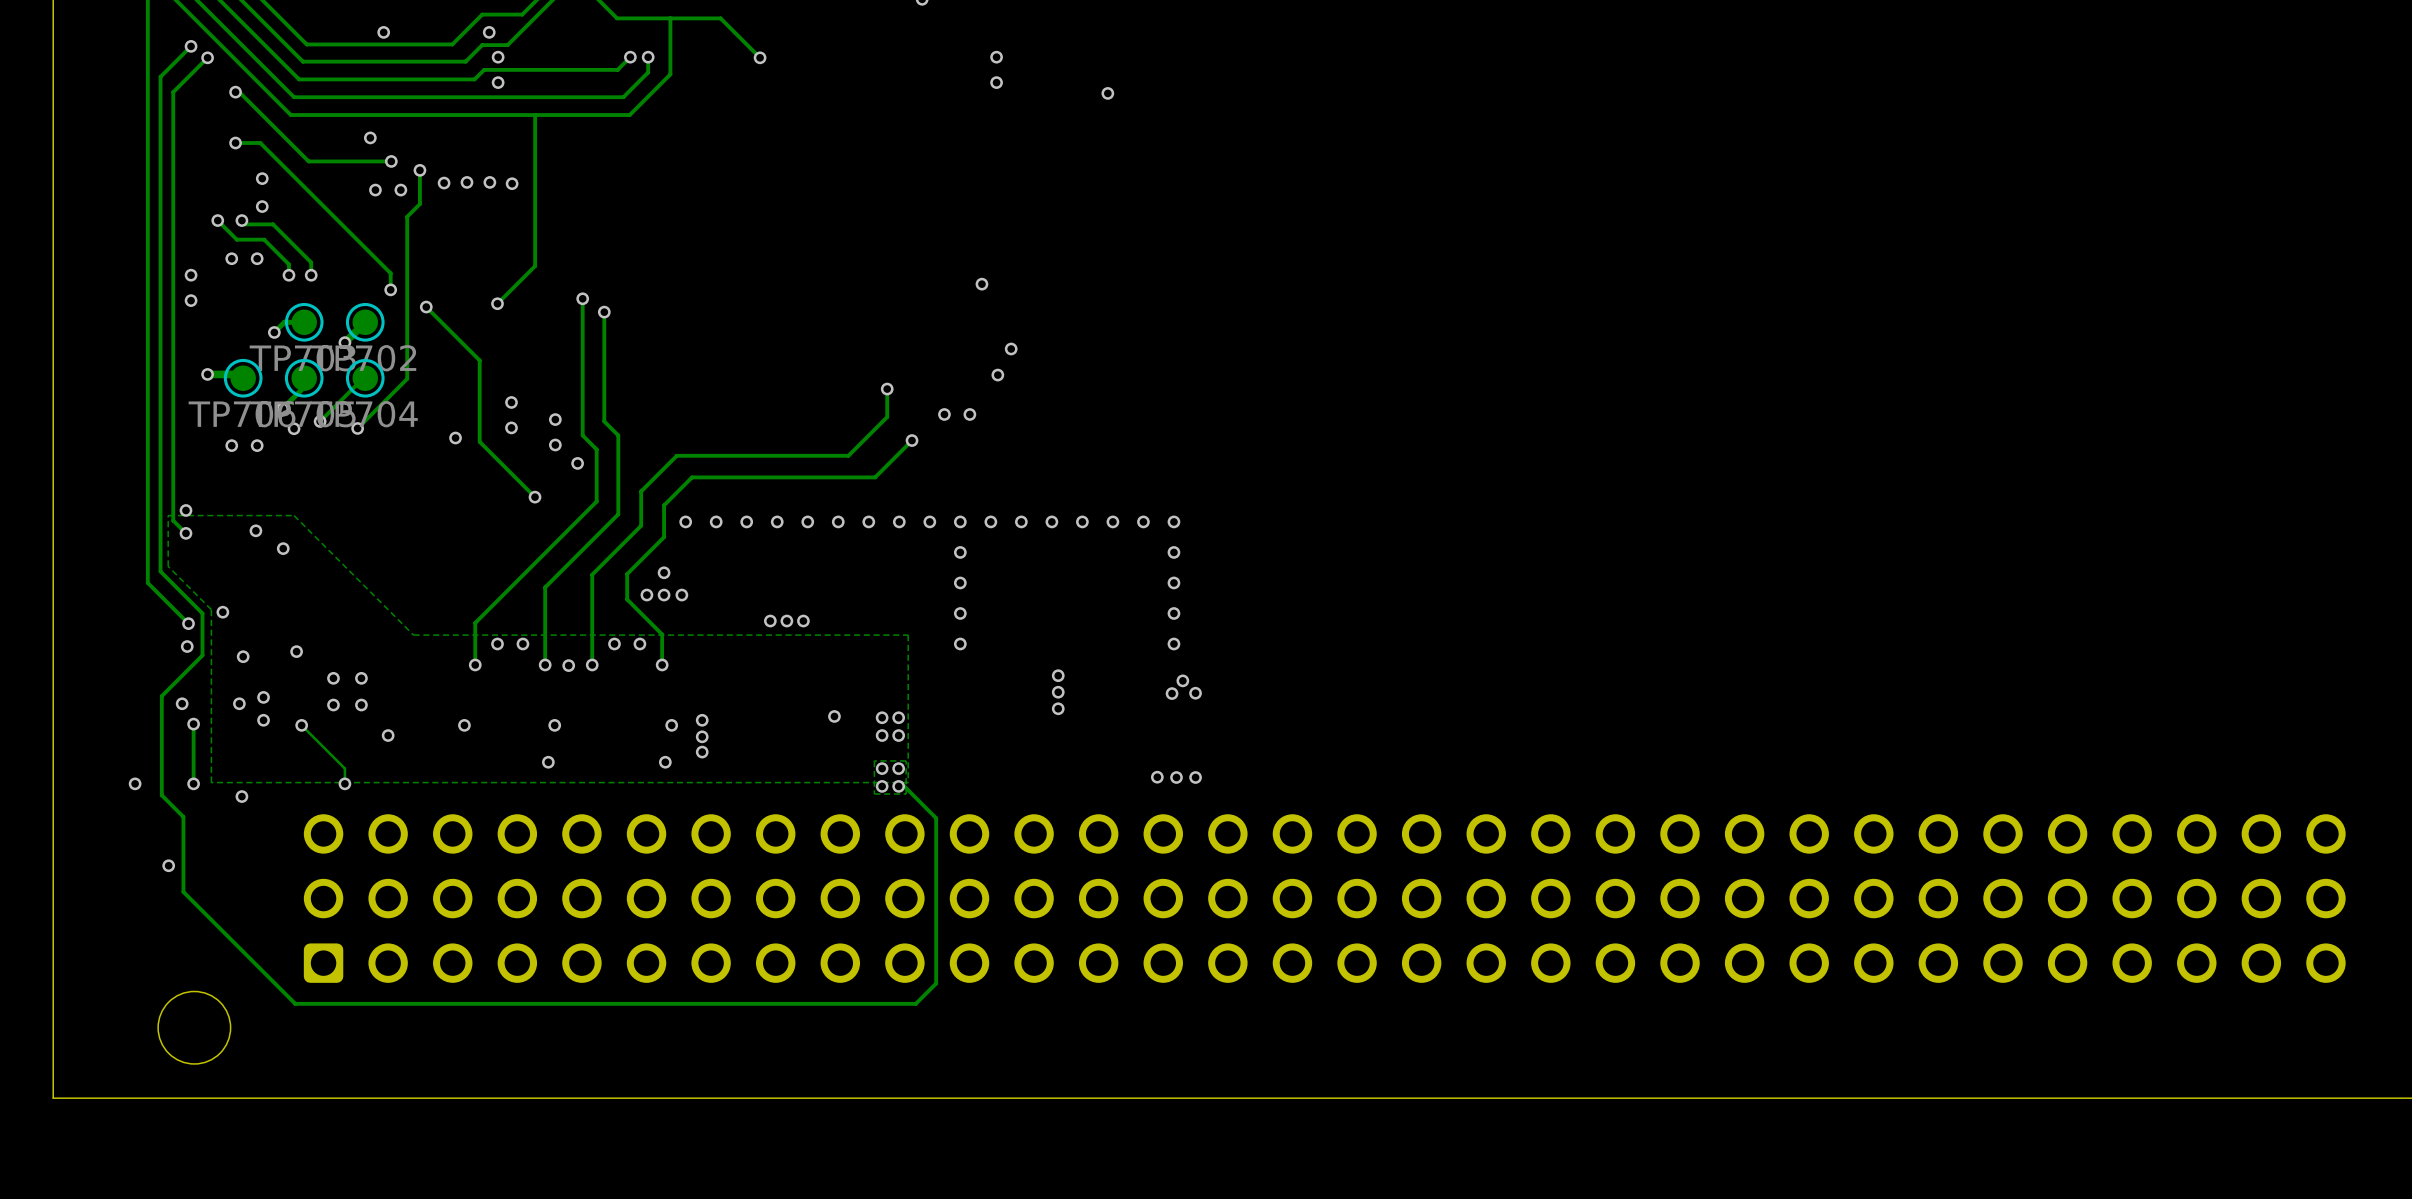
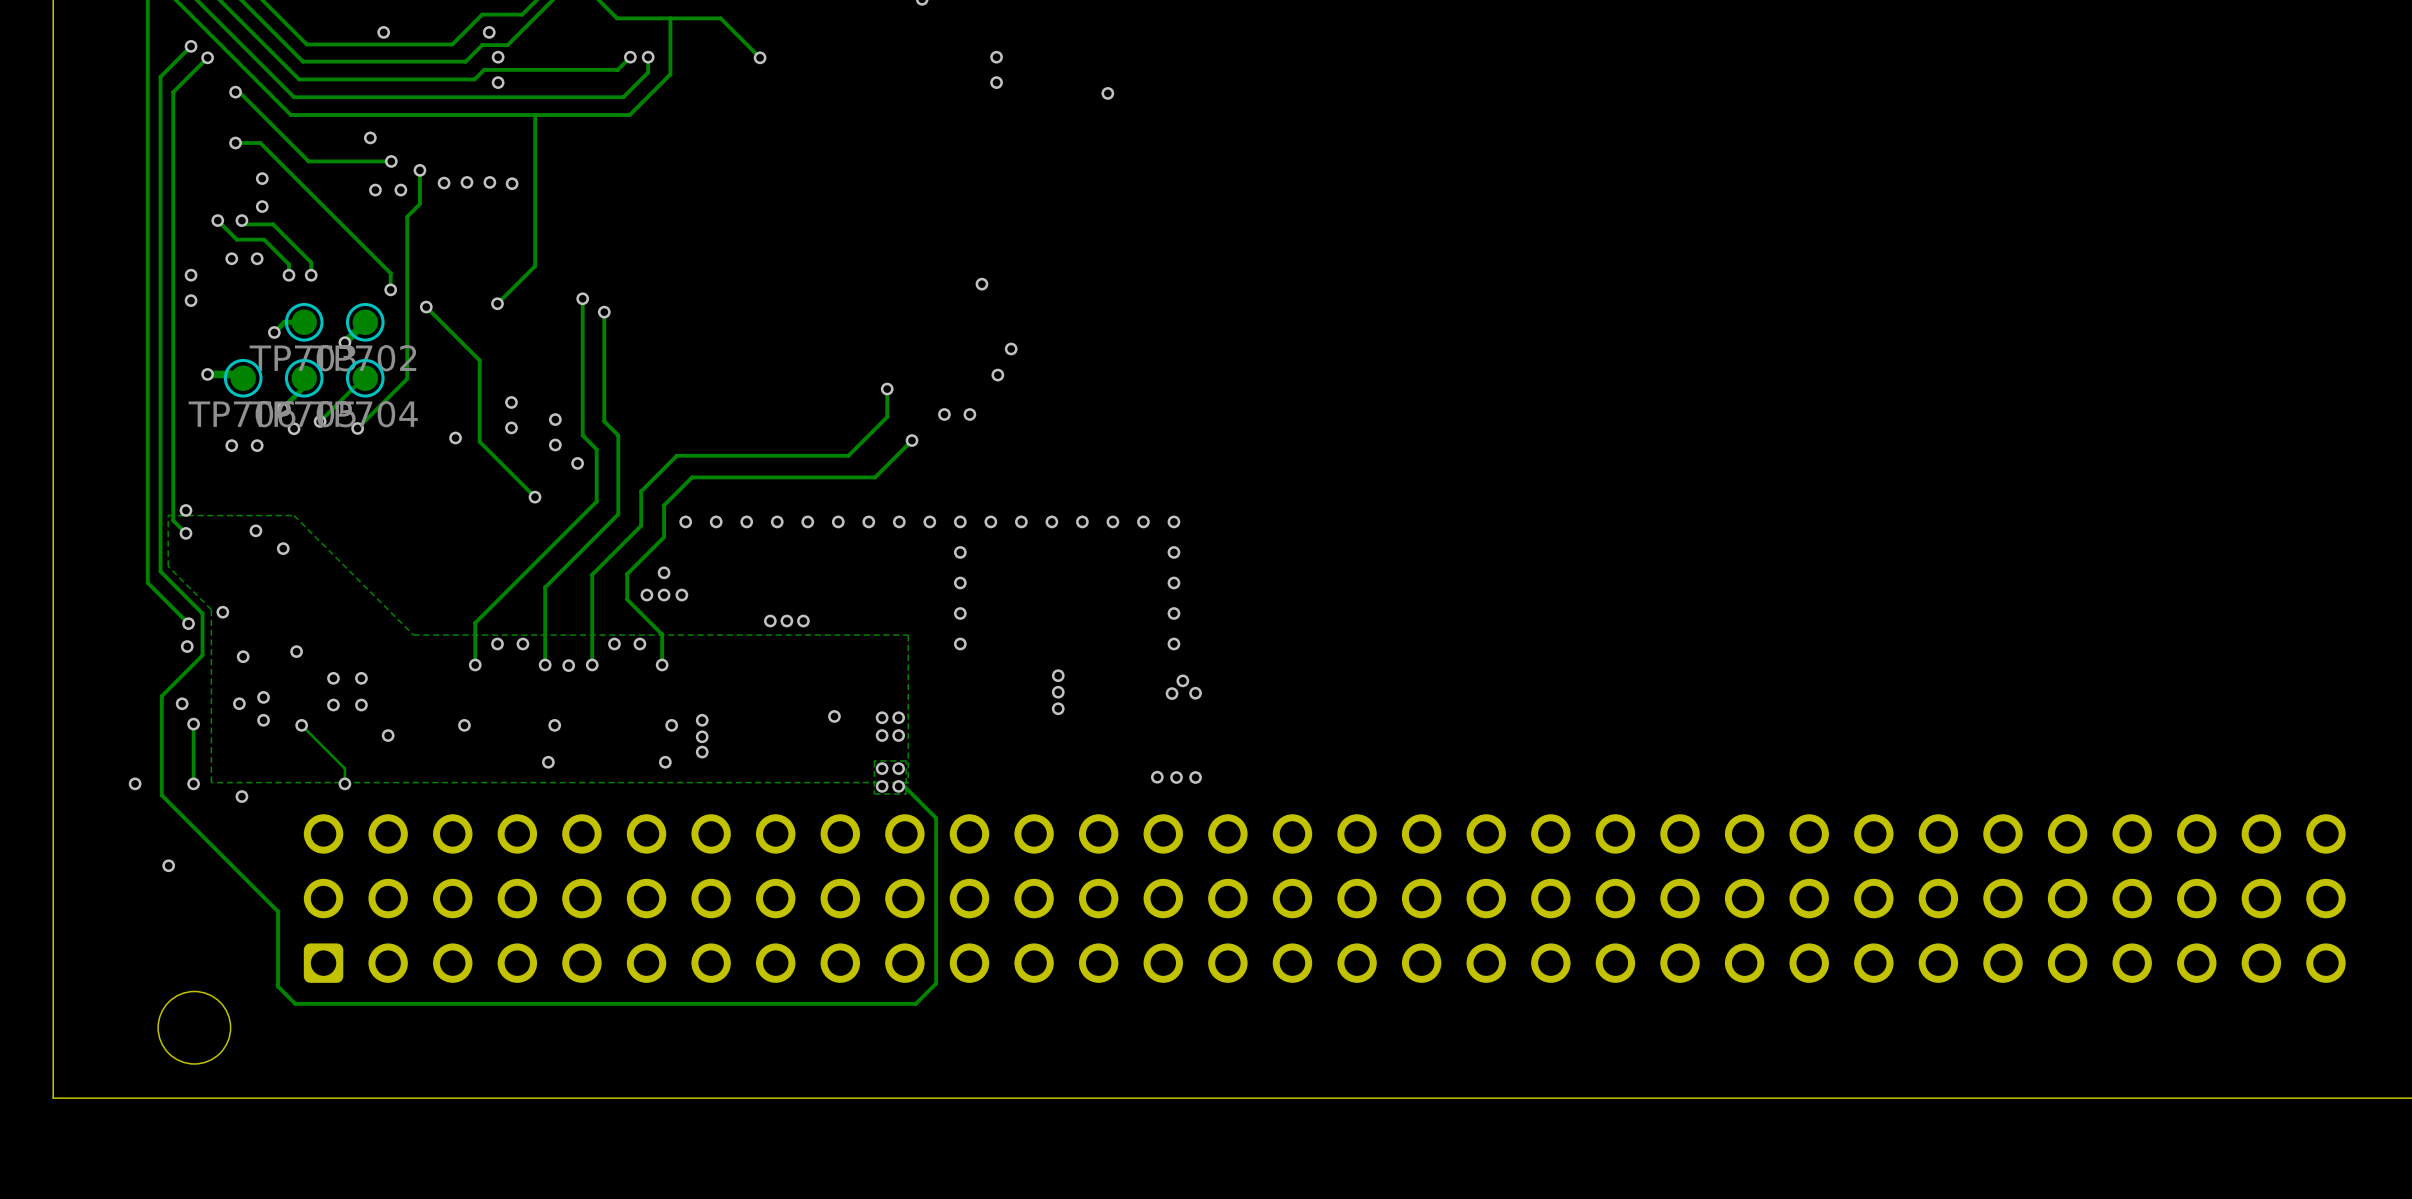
track: (183, 816) (183, 891) (278, 986) -> (183, 816) (278, 911) (278, 986)

